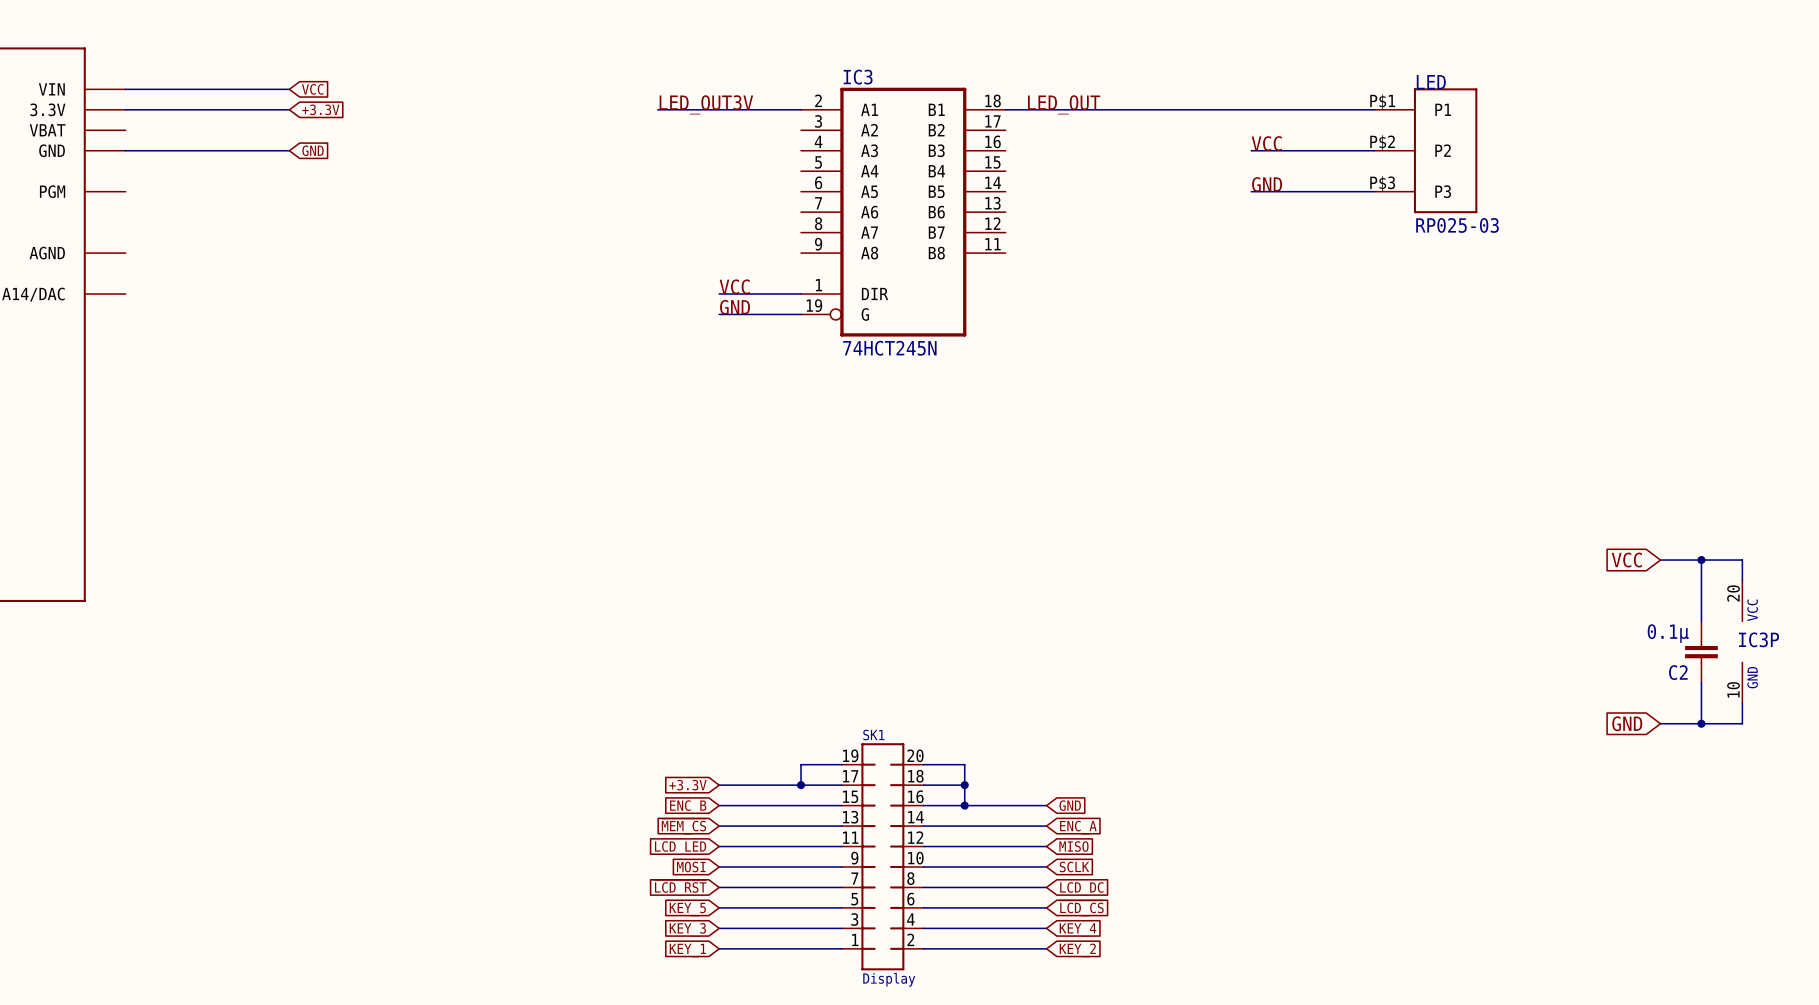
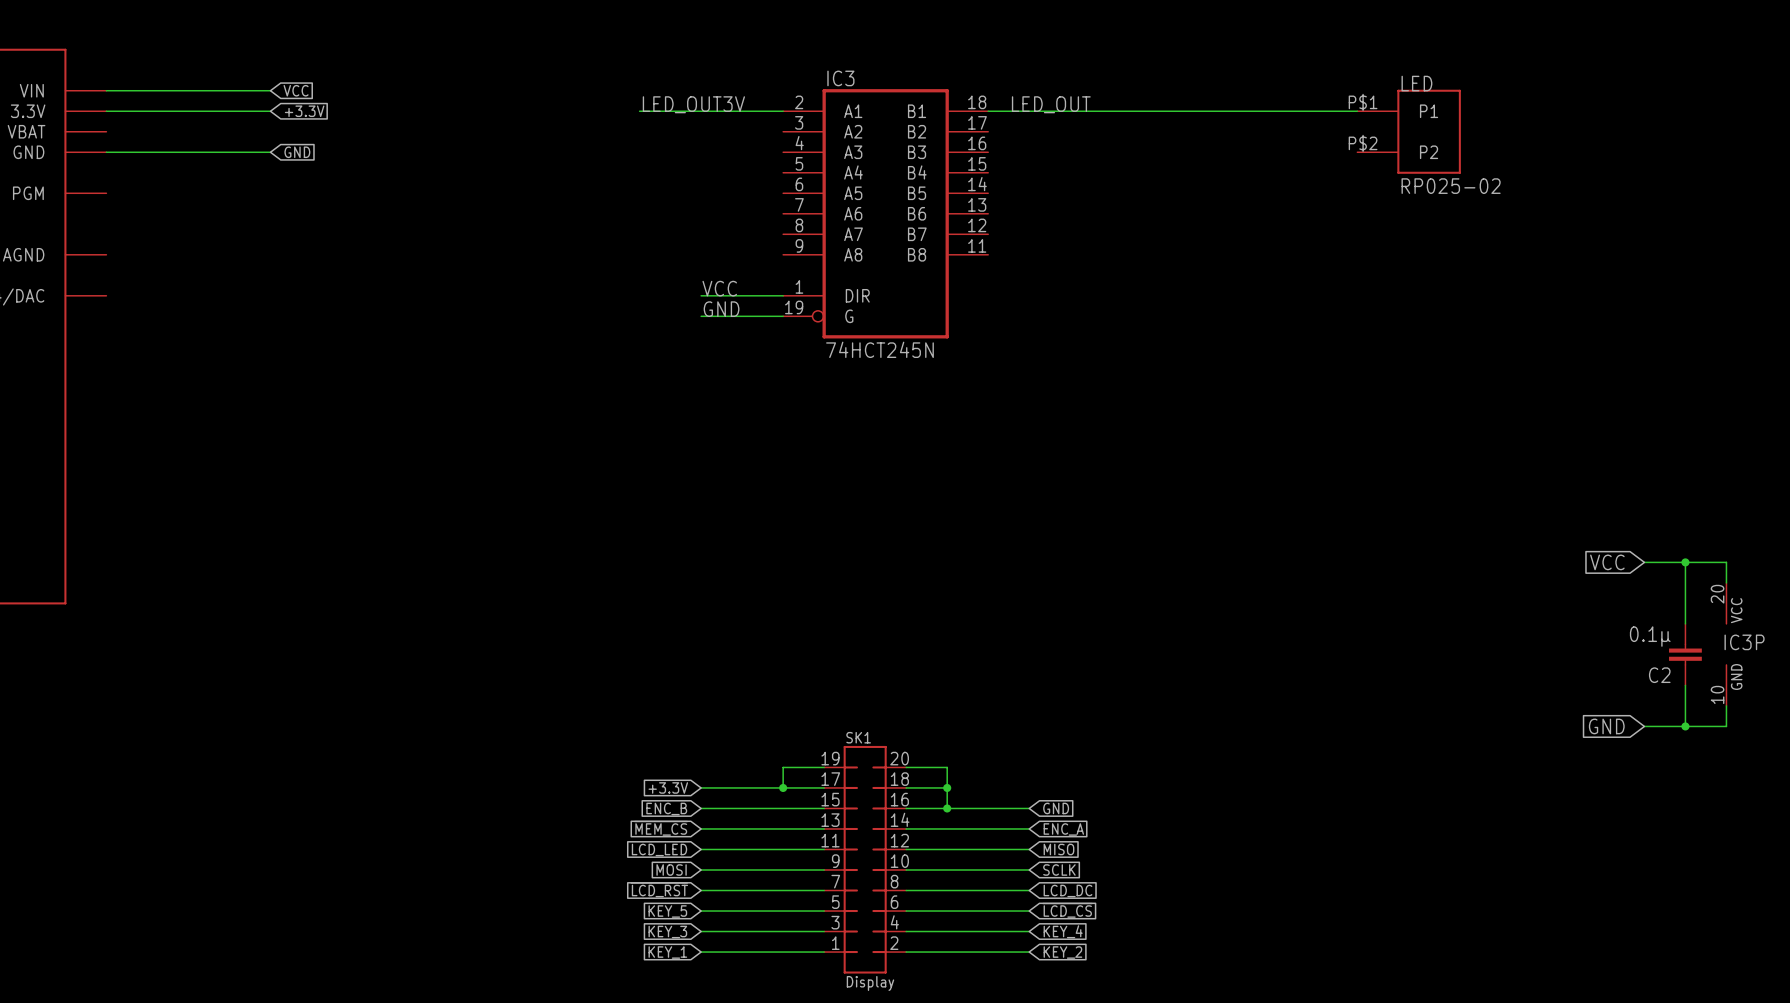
LED: none -> RP025-02 (1409, 131)
label: VCC (1266, 143) -> none
wire: (1251, 150) (1374, 150) -> none
LED: RP025-03 (1425, 150) -> none
label: GND (1267, 184) -> none
wire: (1251, 191) (1374, 191) -> none

